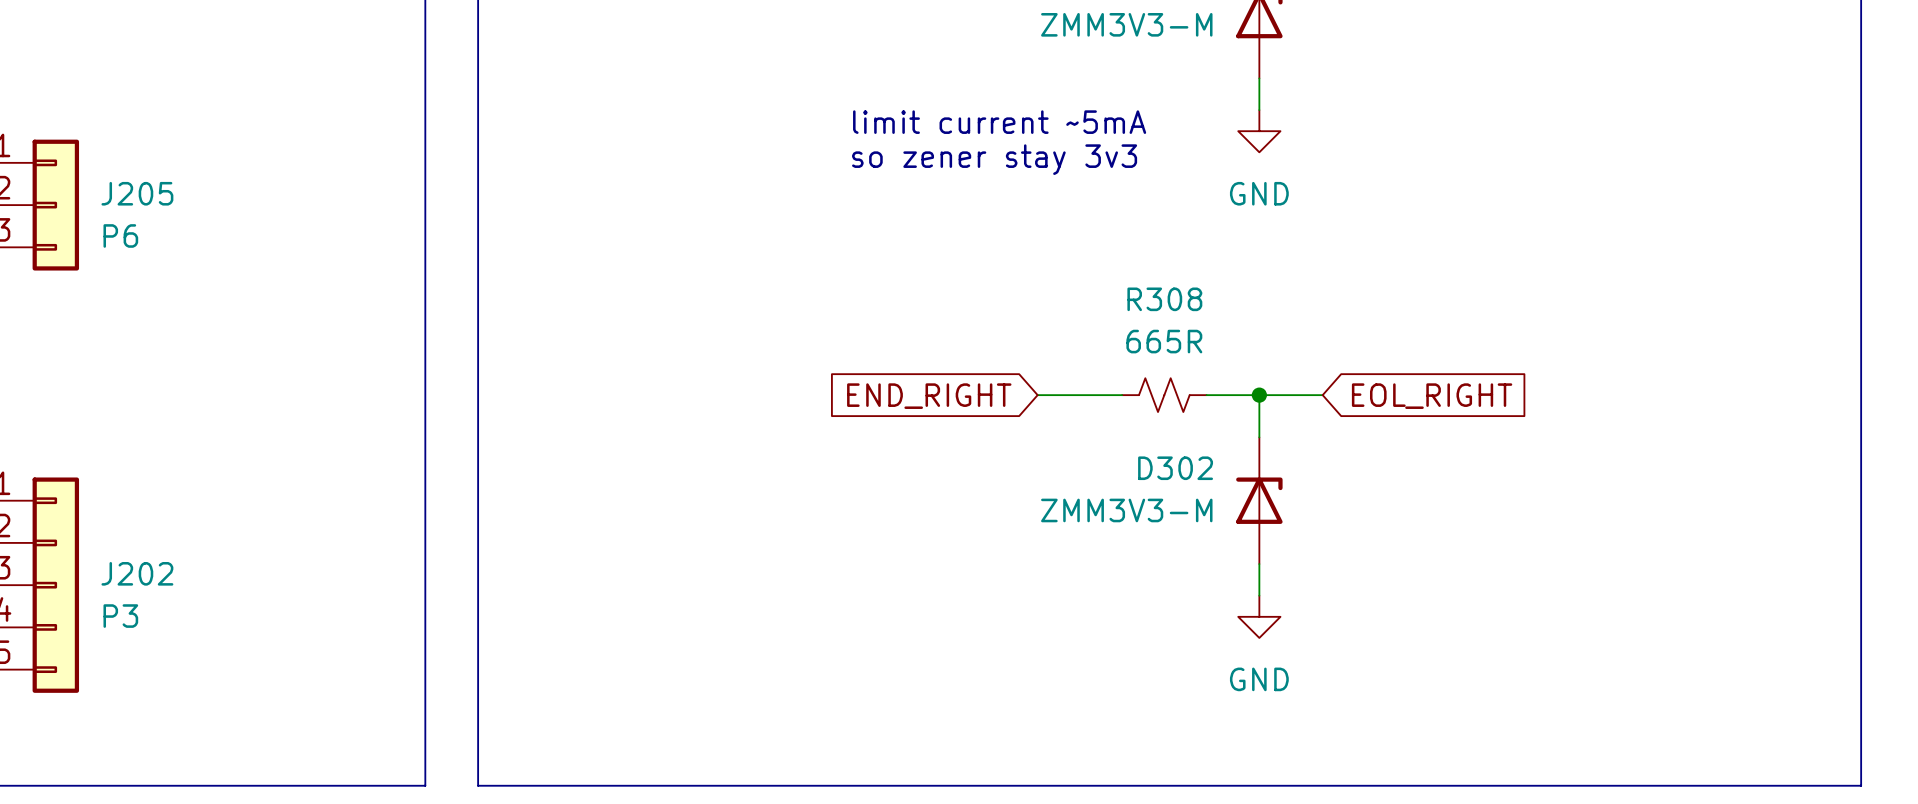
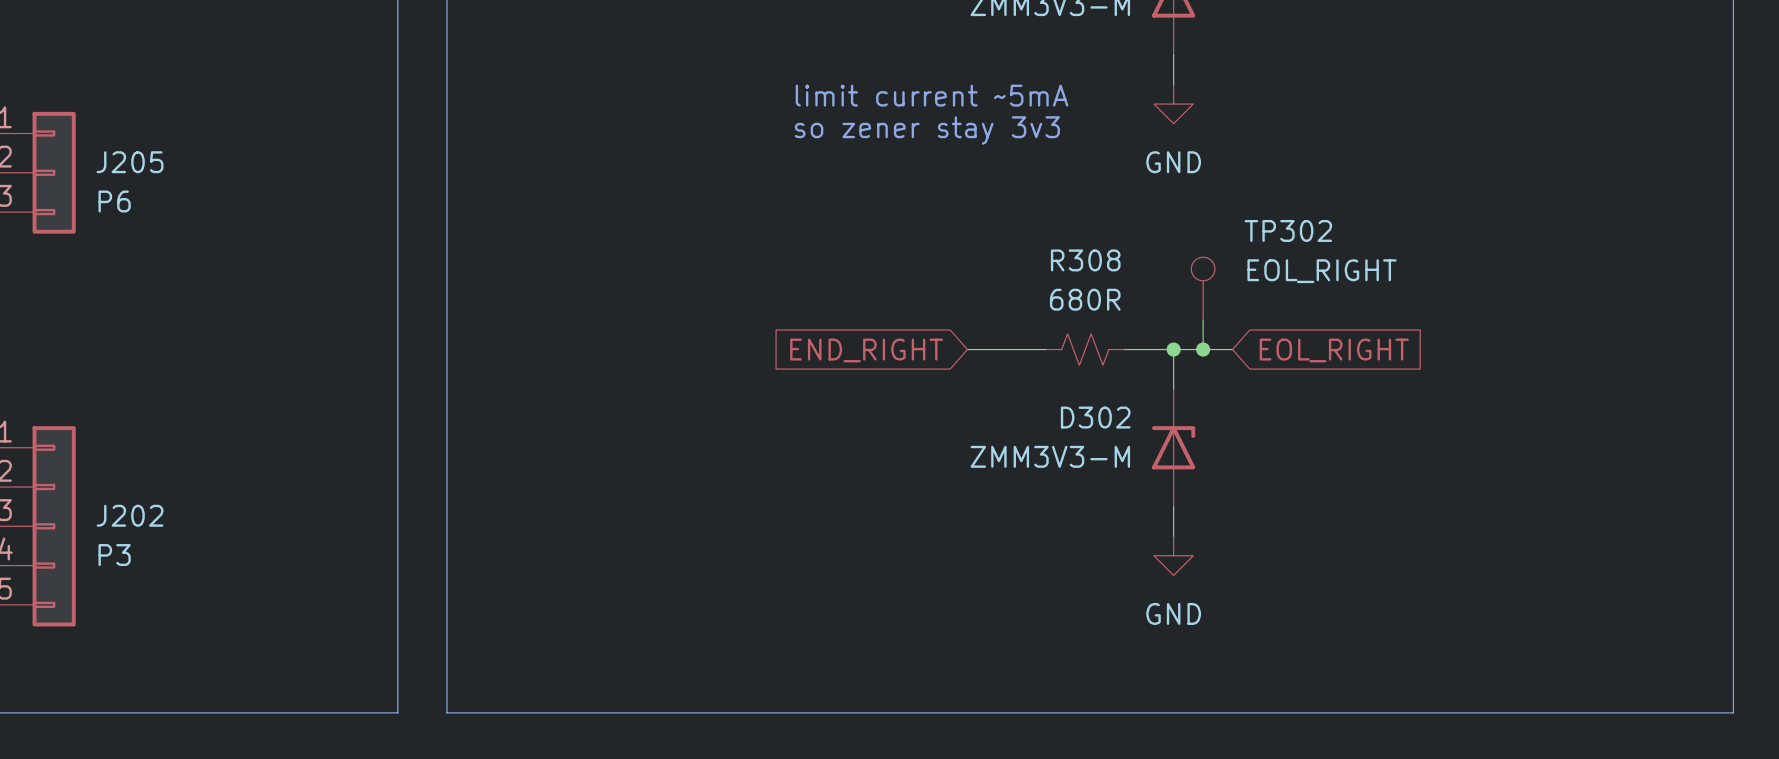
TP302: none -> EOL_RIGHT (1203, 288)
R308 value: 665R (1164, 341) -> 680R (1085, 299)
wire: none -> (1203, 320) (1203, 349)
junction: none -> (1203, 349)

